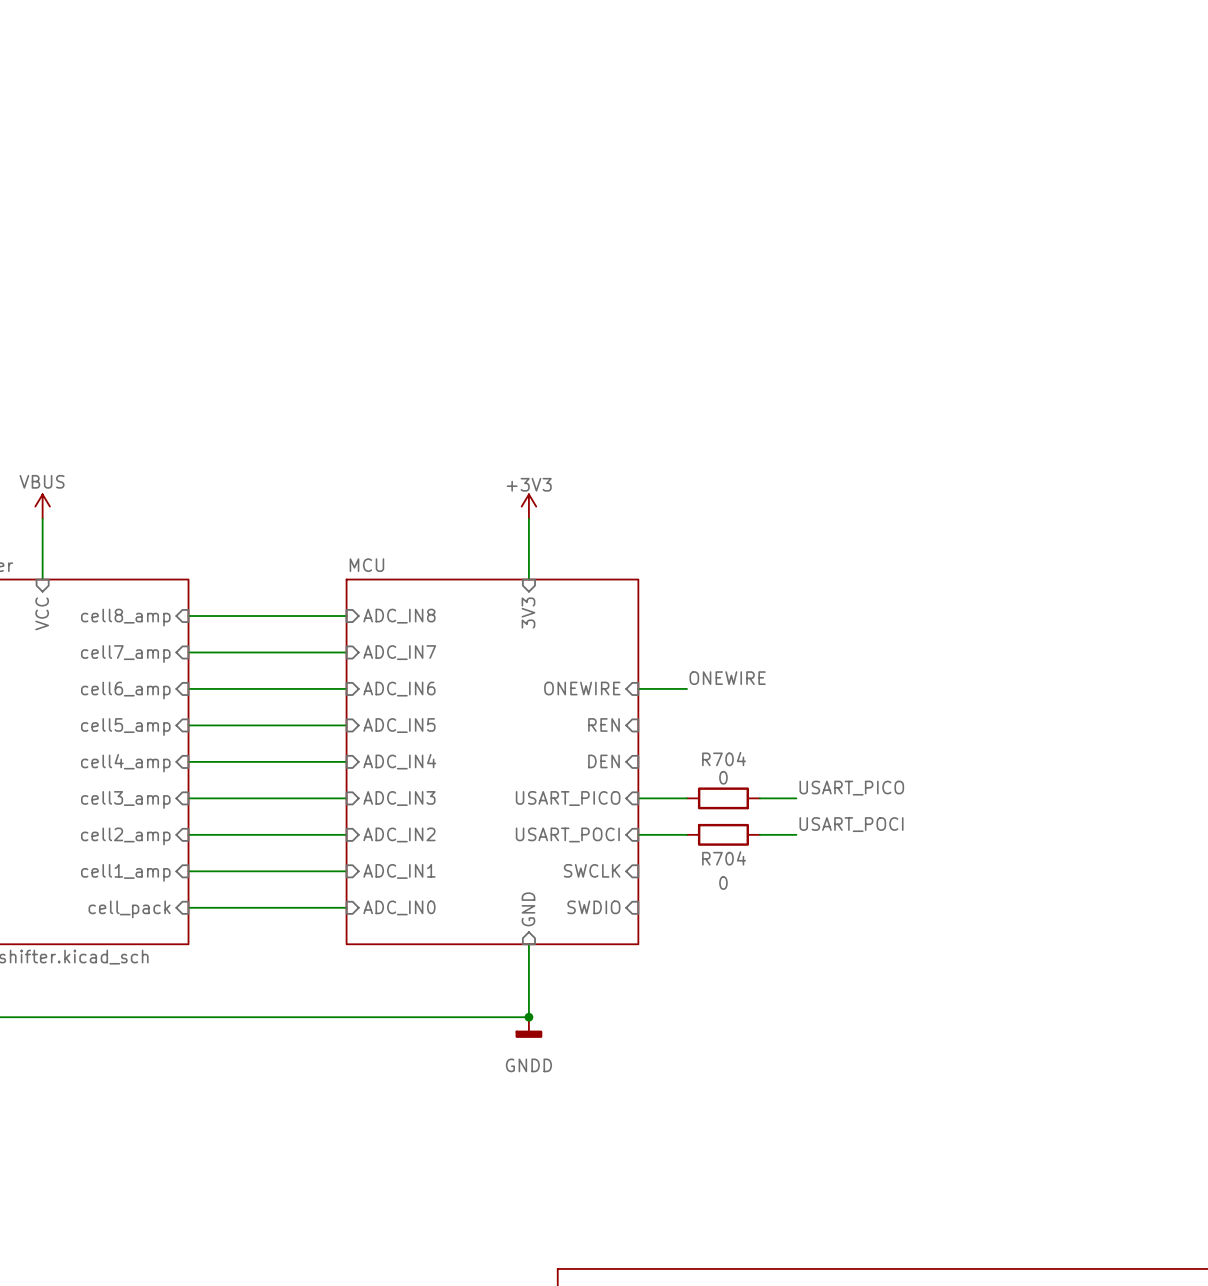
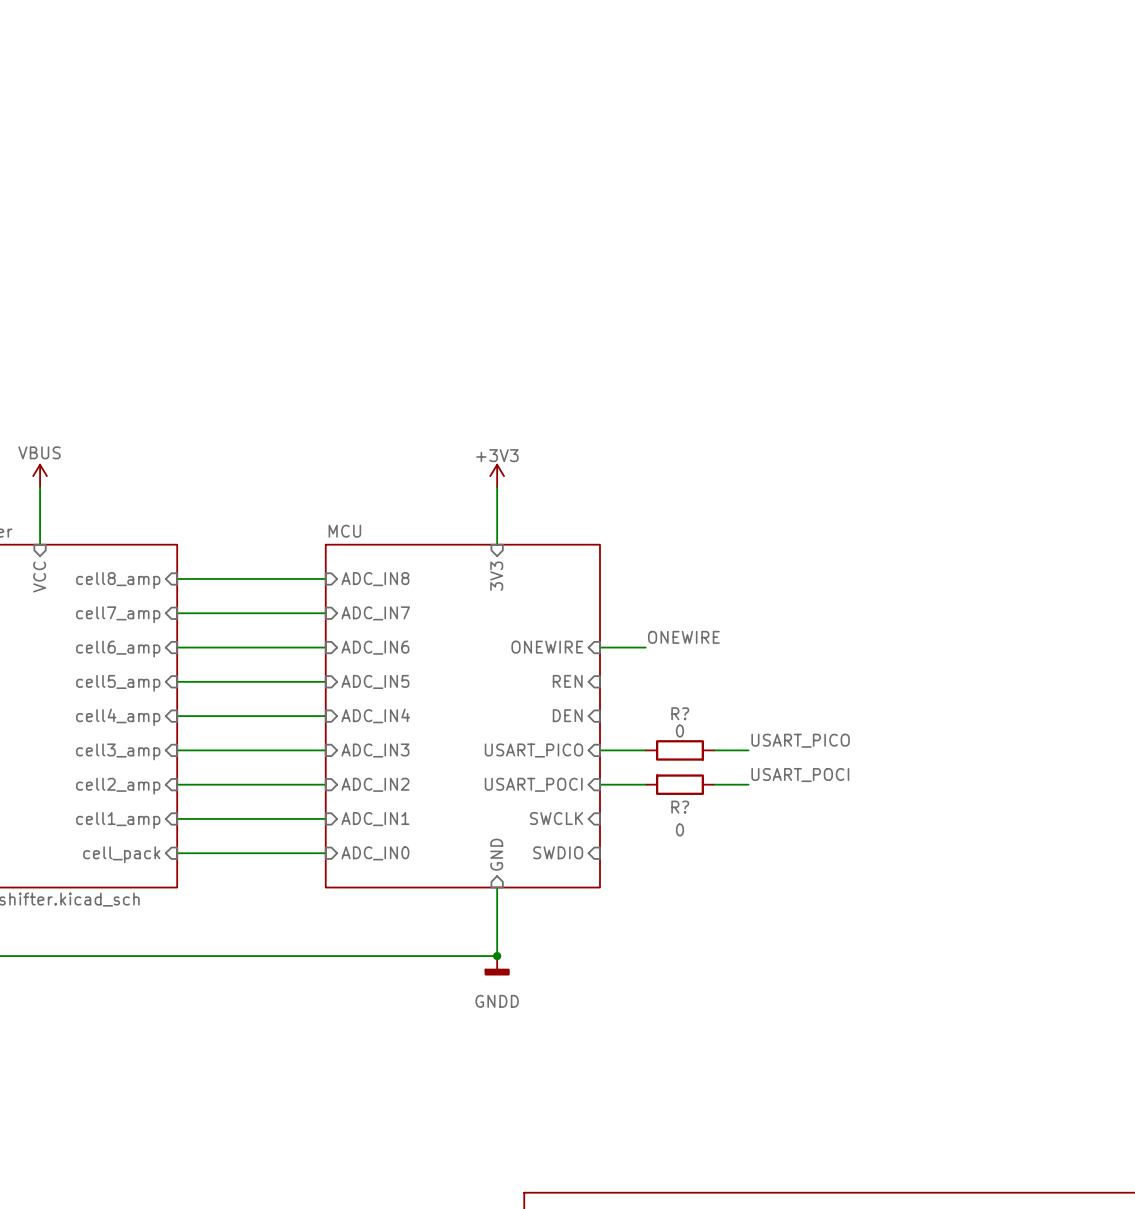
R704 name: R704 (724, 759) -> R? (680, 713)
R704 name: R704 (724, 858) -> R? (680, 807)

